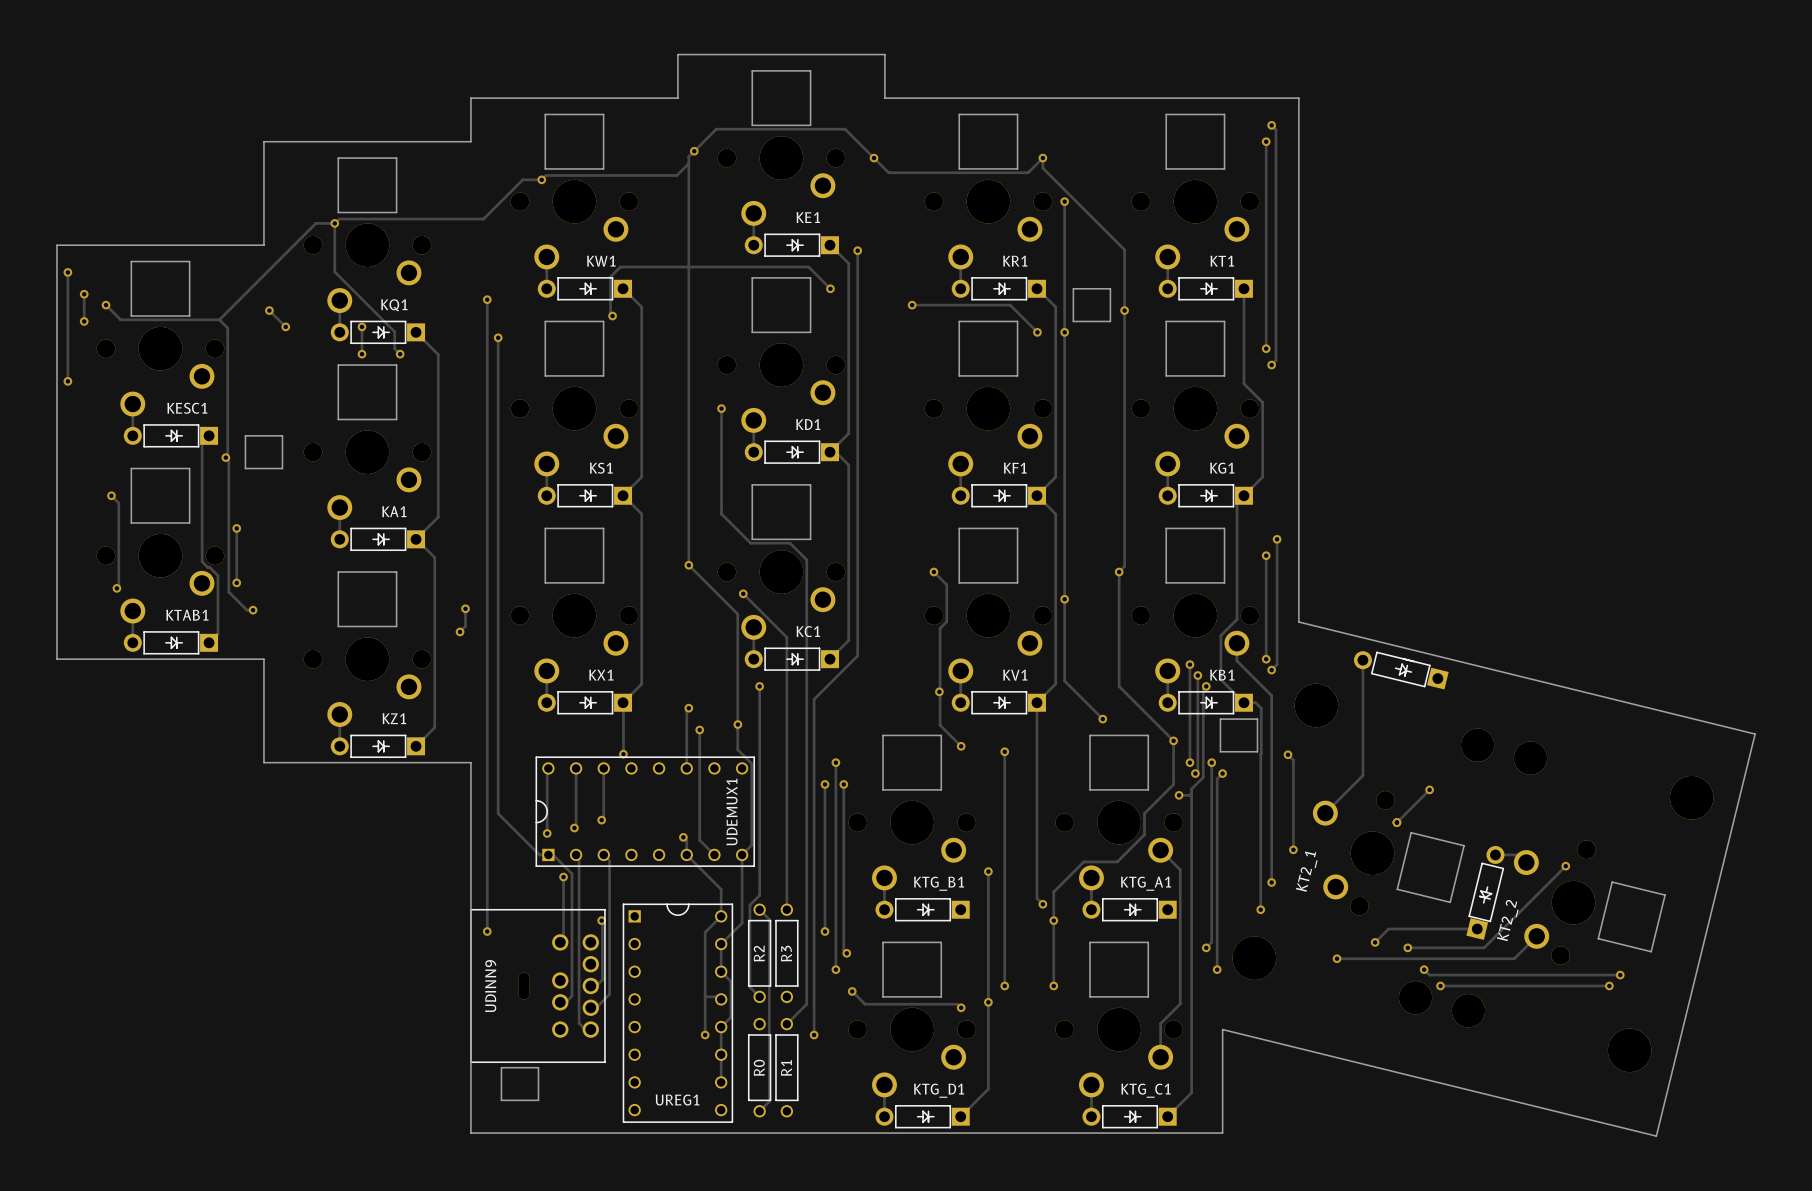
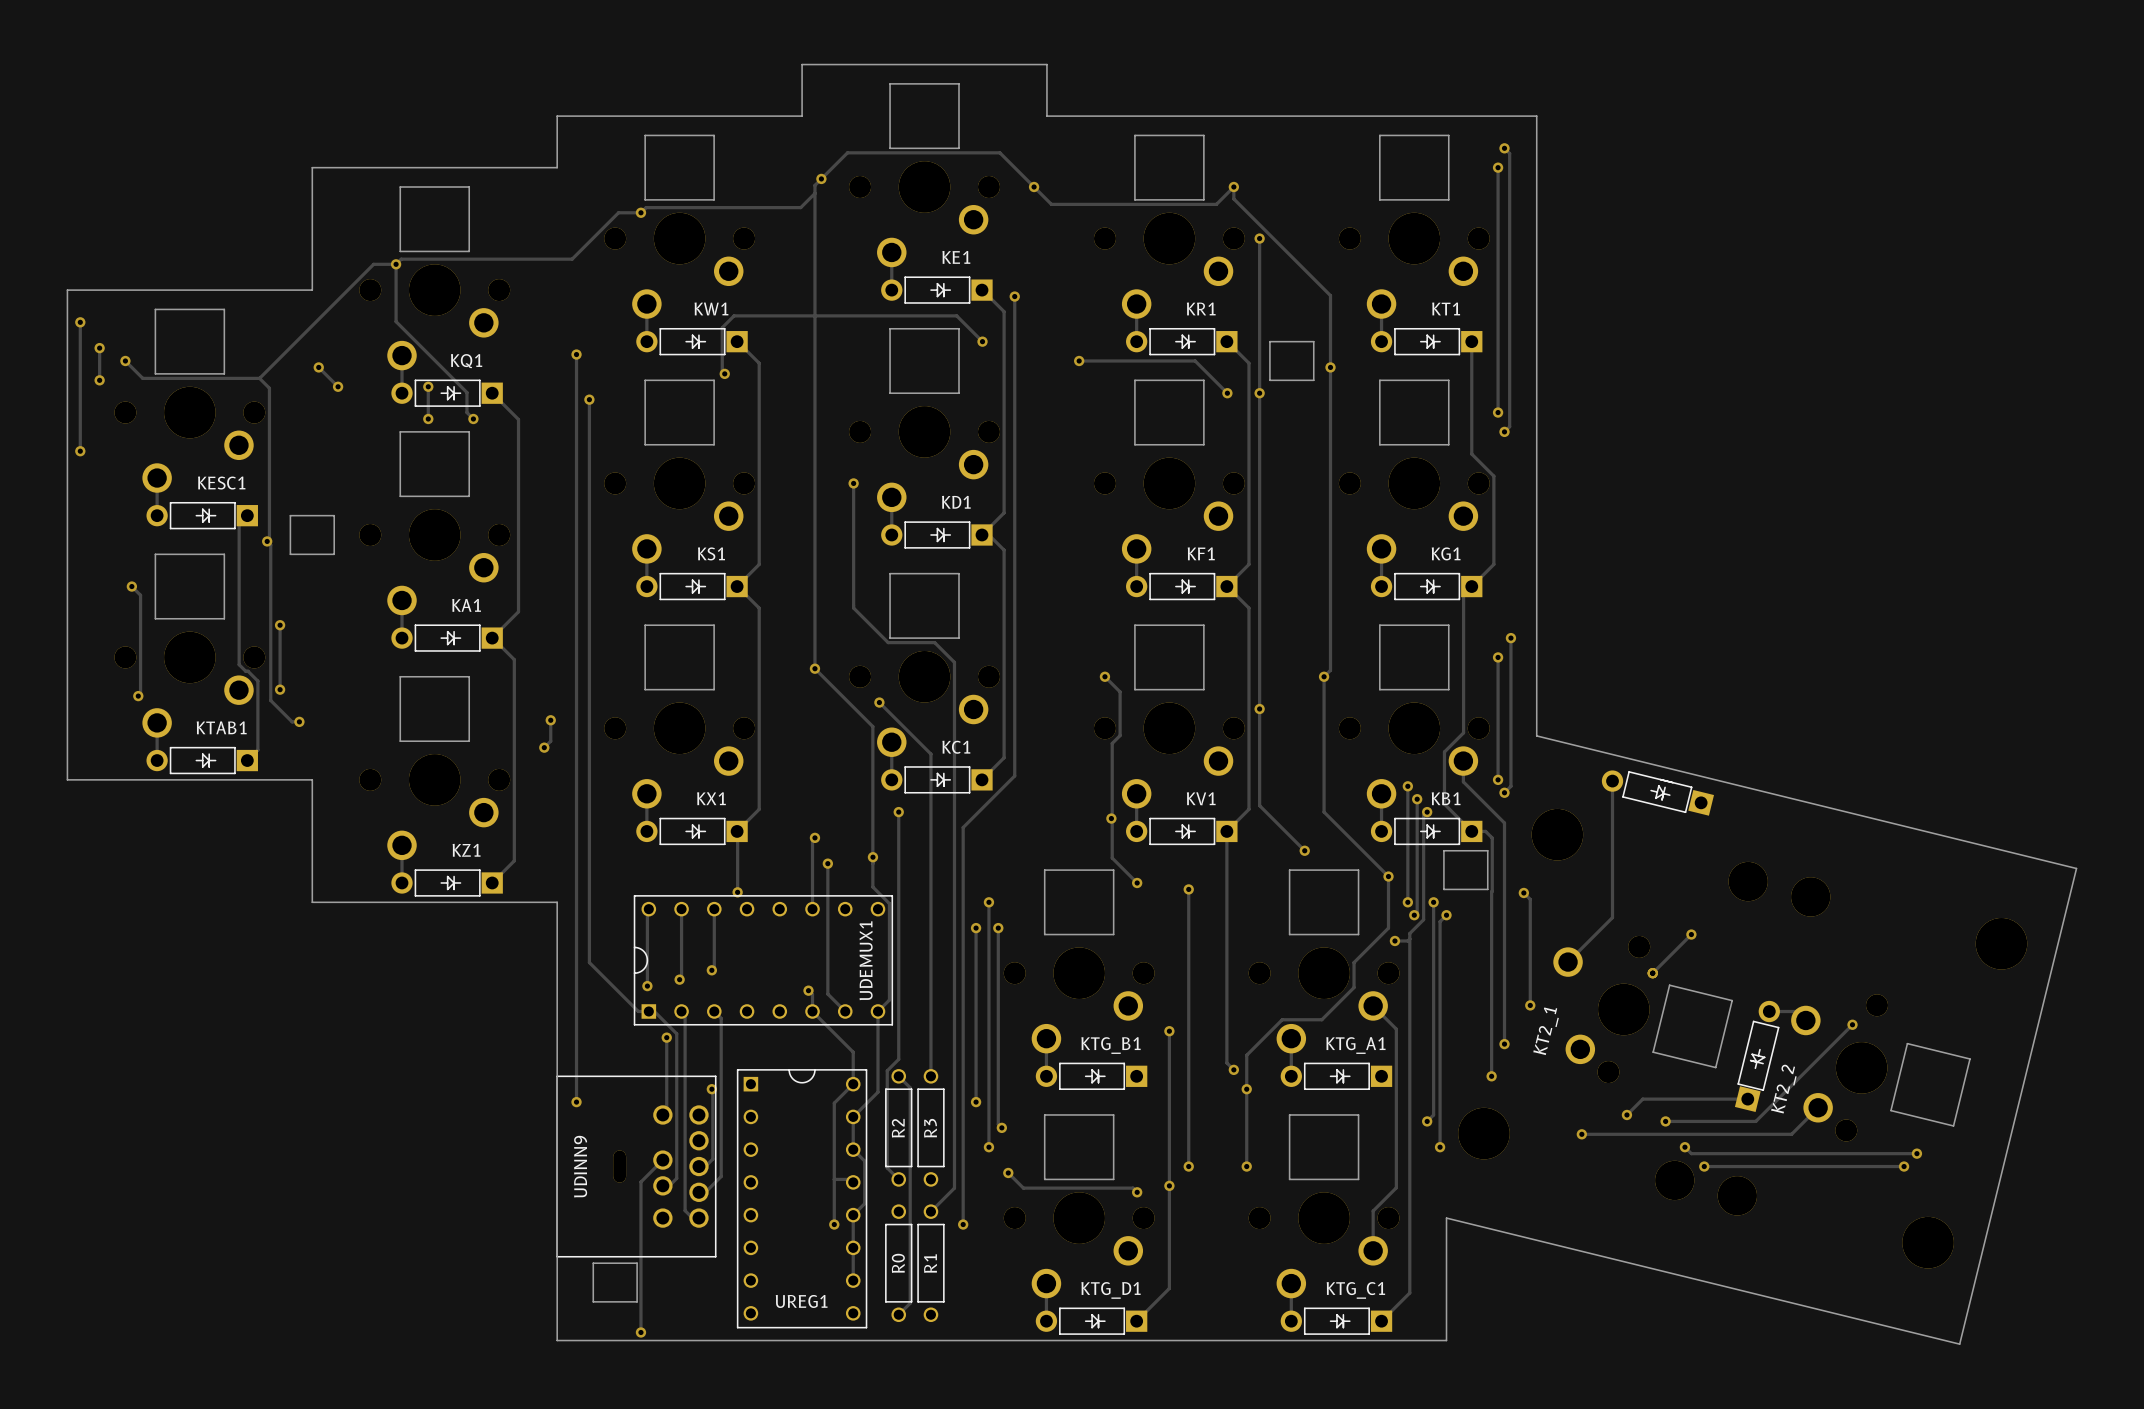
track: none -> (662, 1160) (640, 1182) (640, 1332)
via: none -> (640, 1332)

